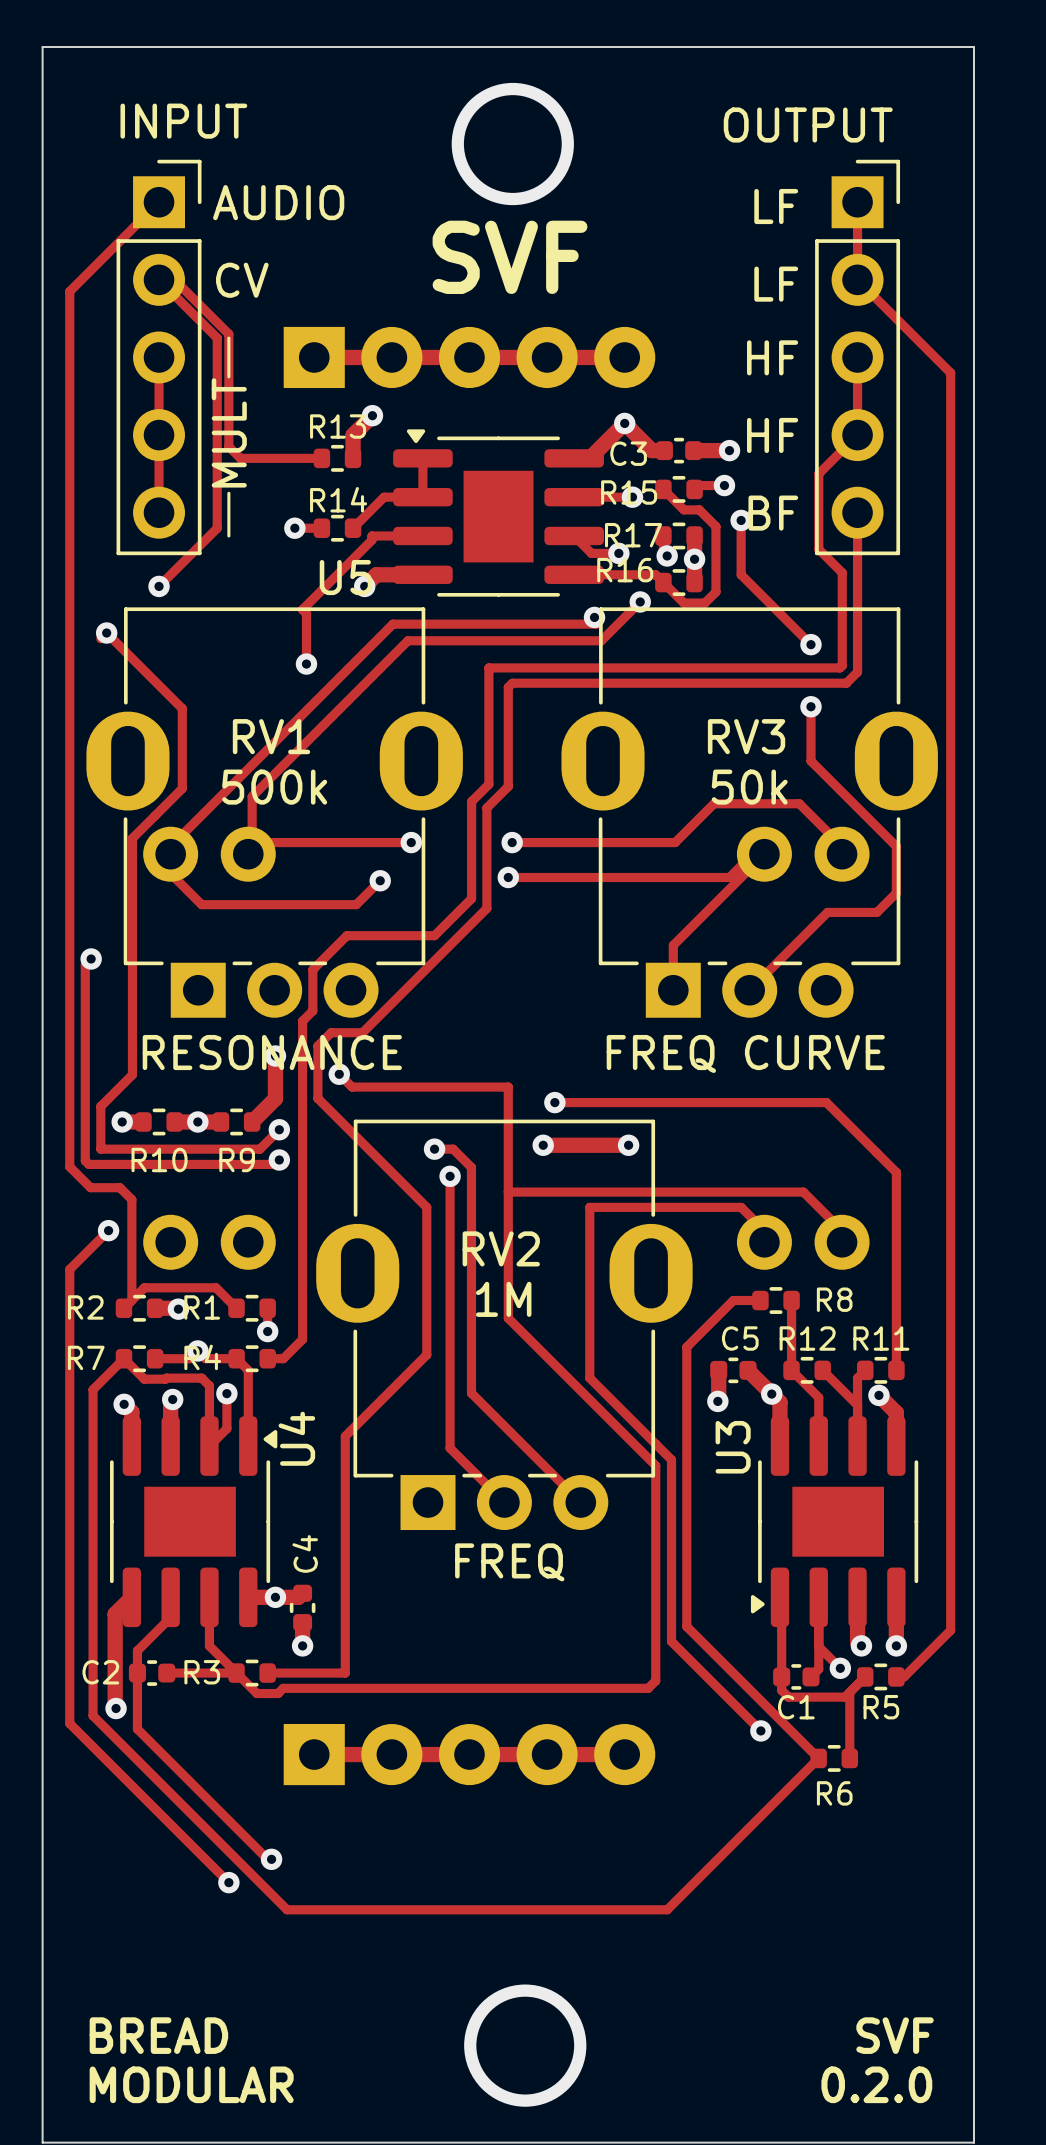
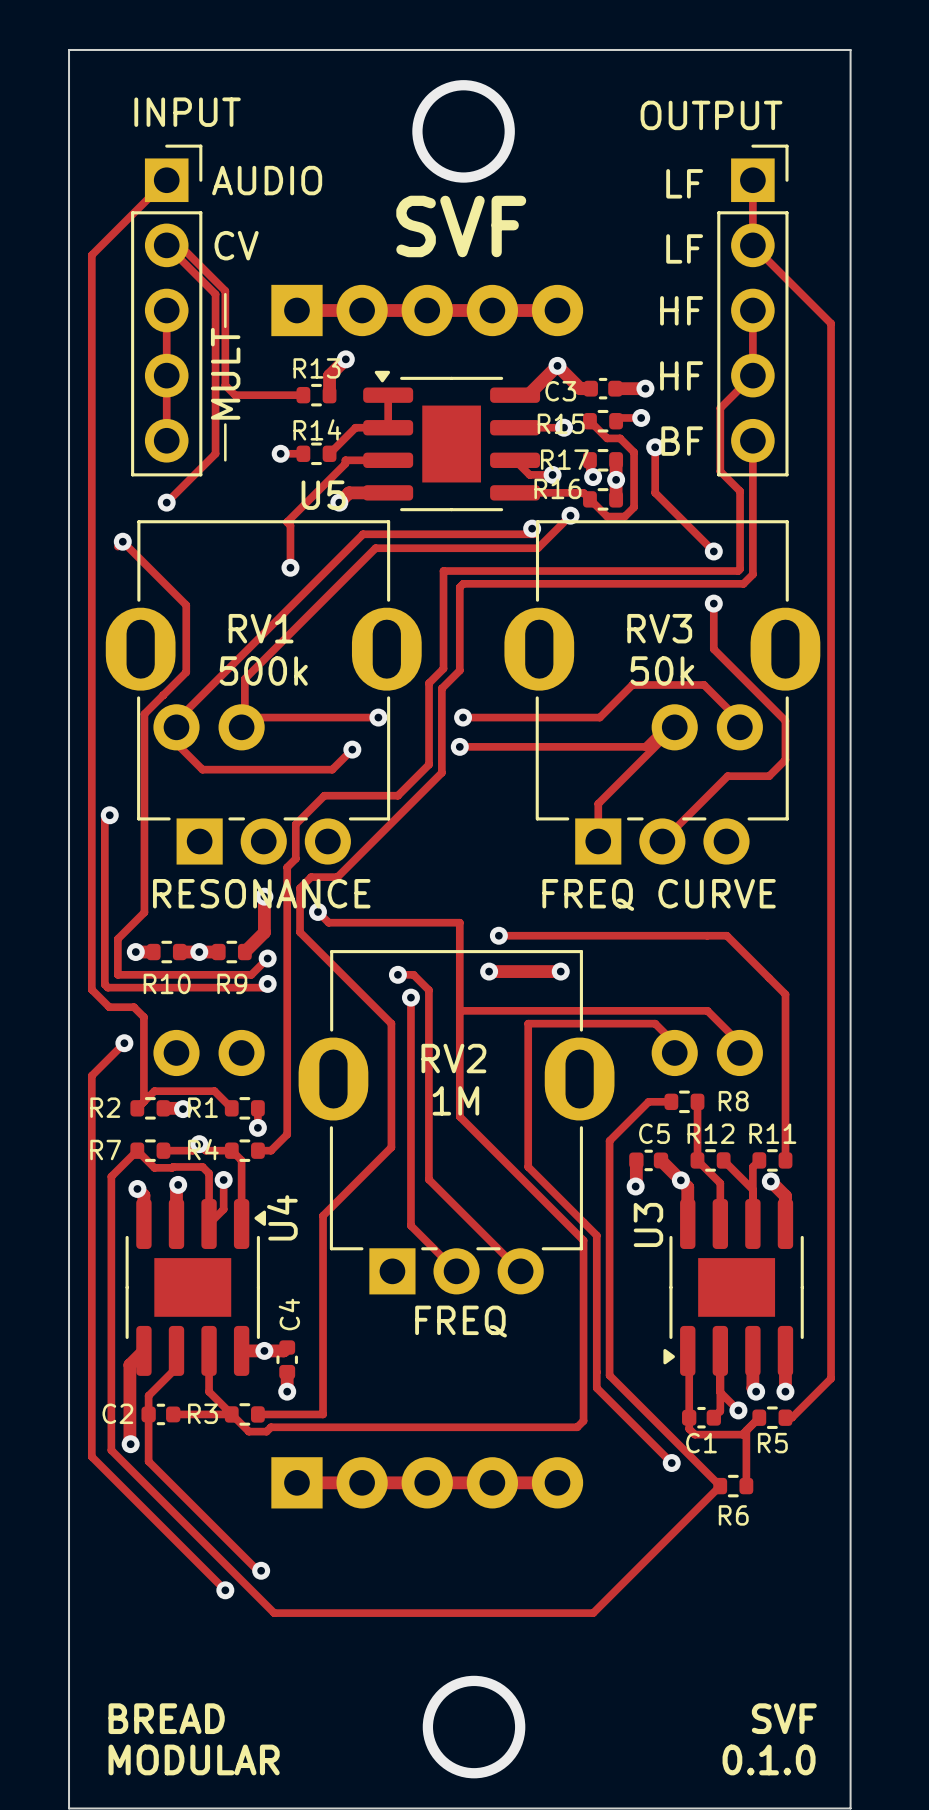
text: 0.2.0 (876, 2084) -> 0.1.0 (769, 1759)

